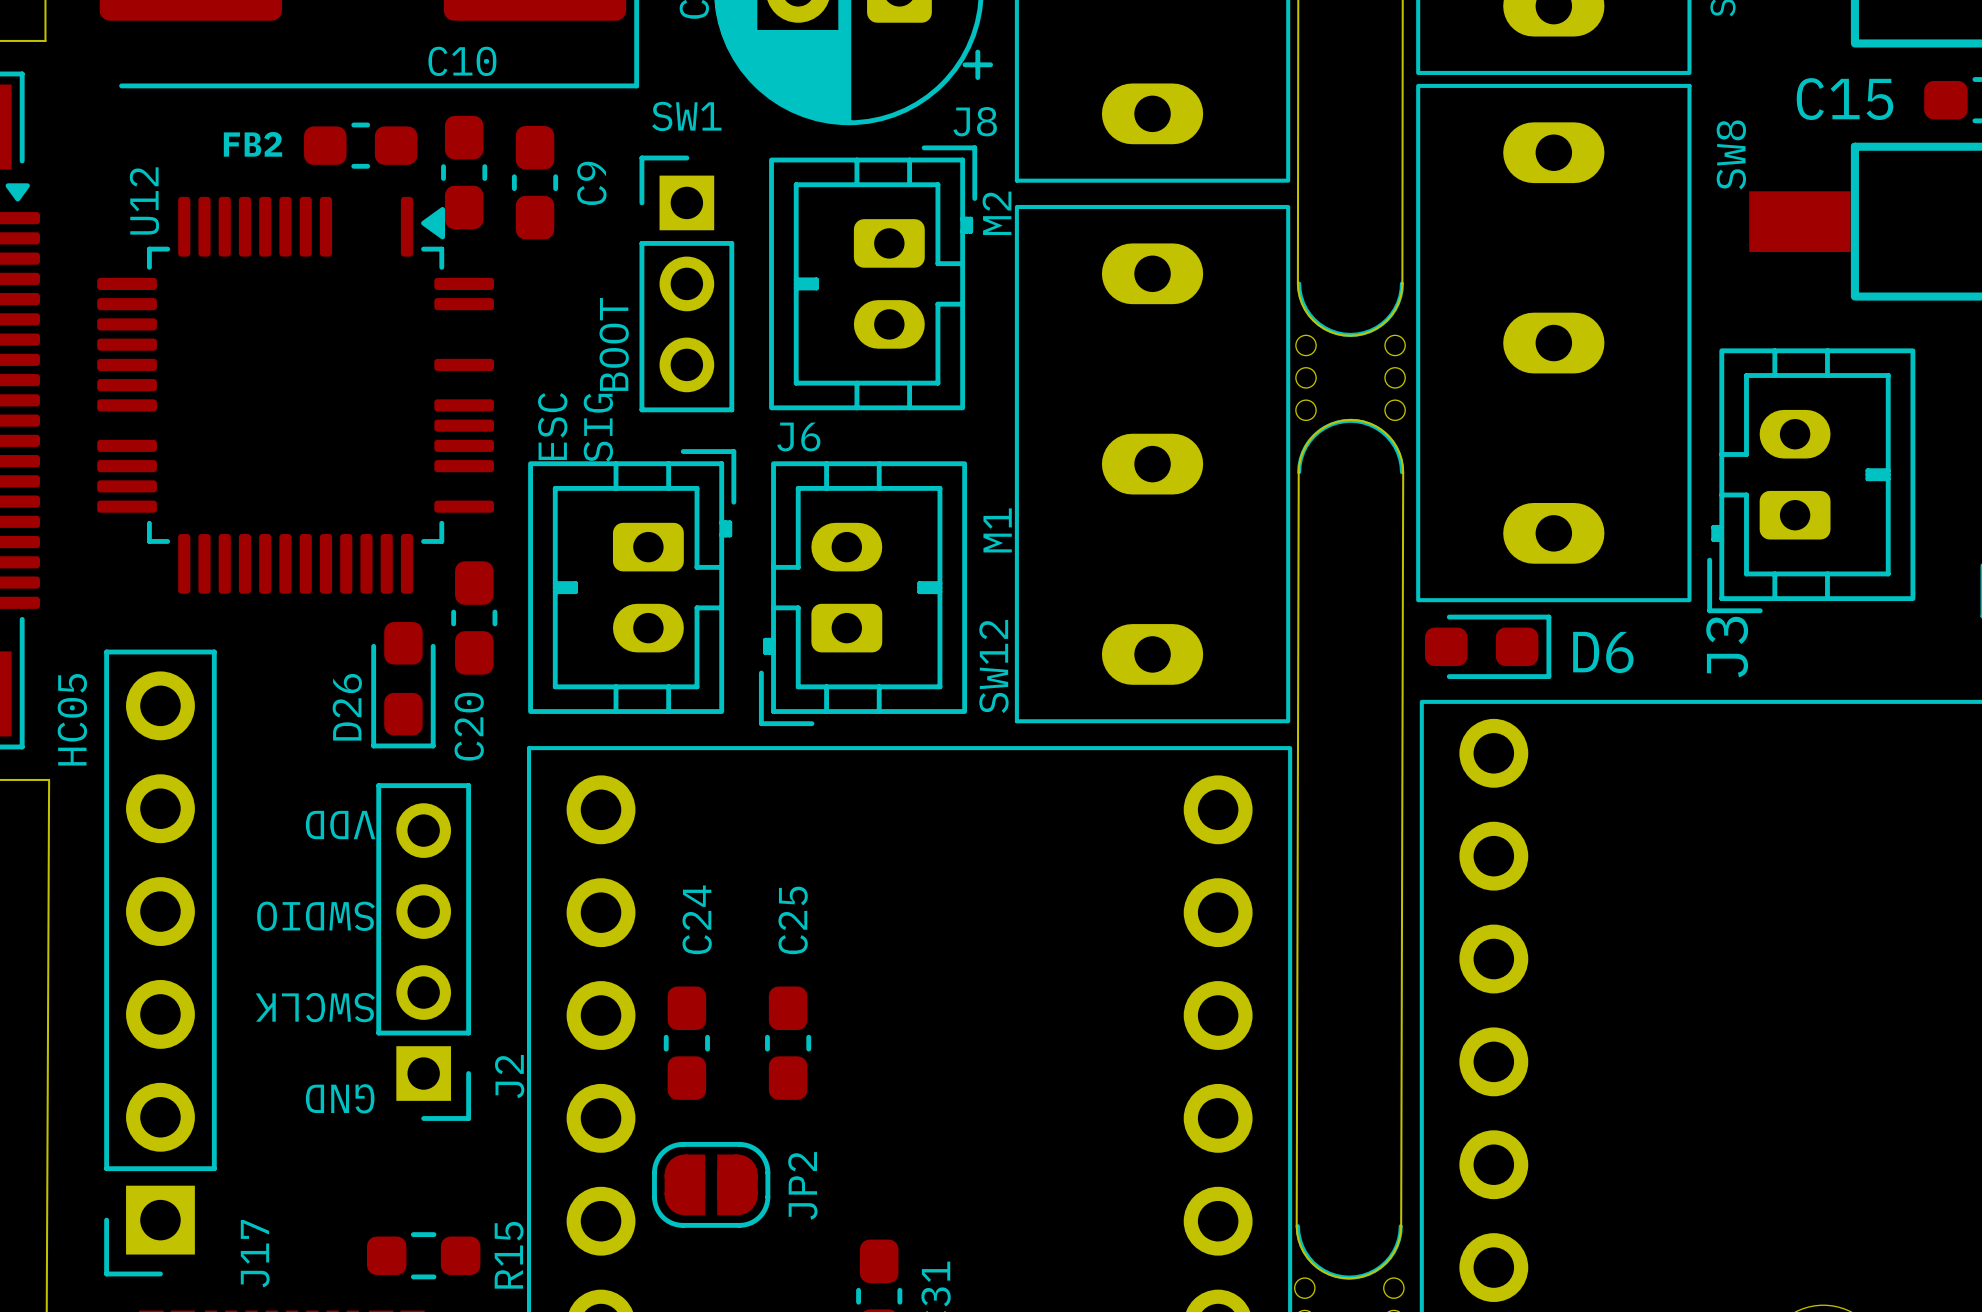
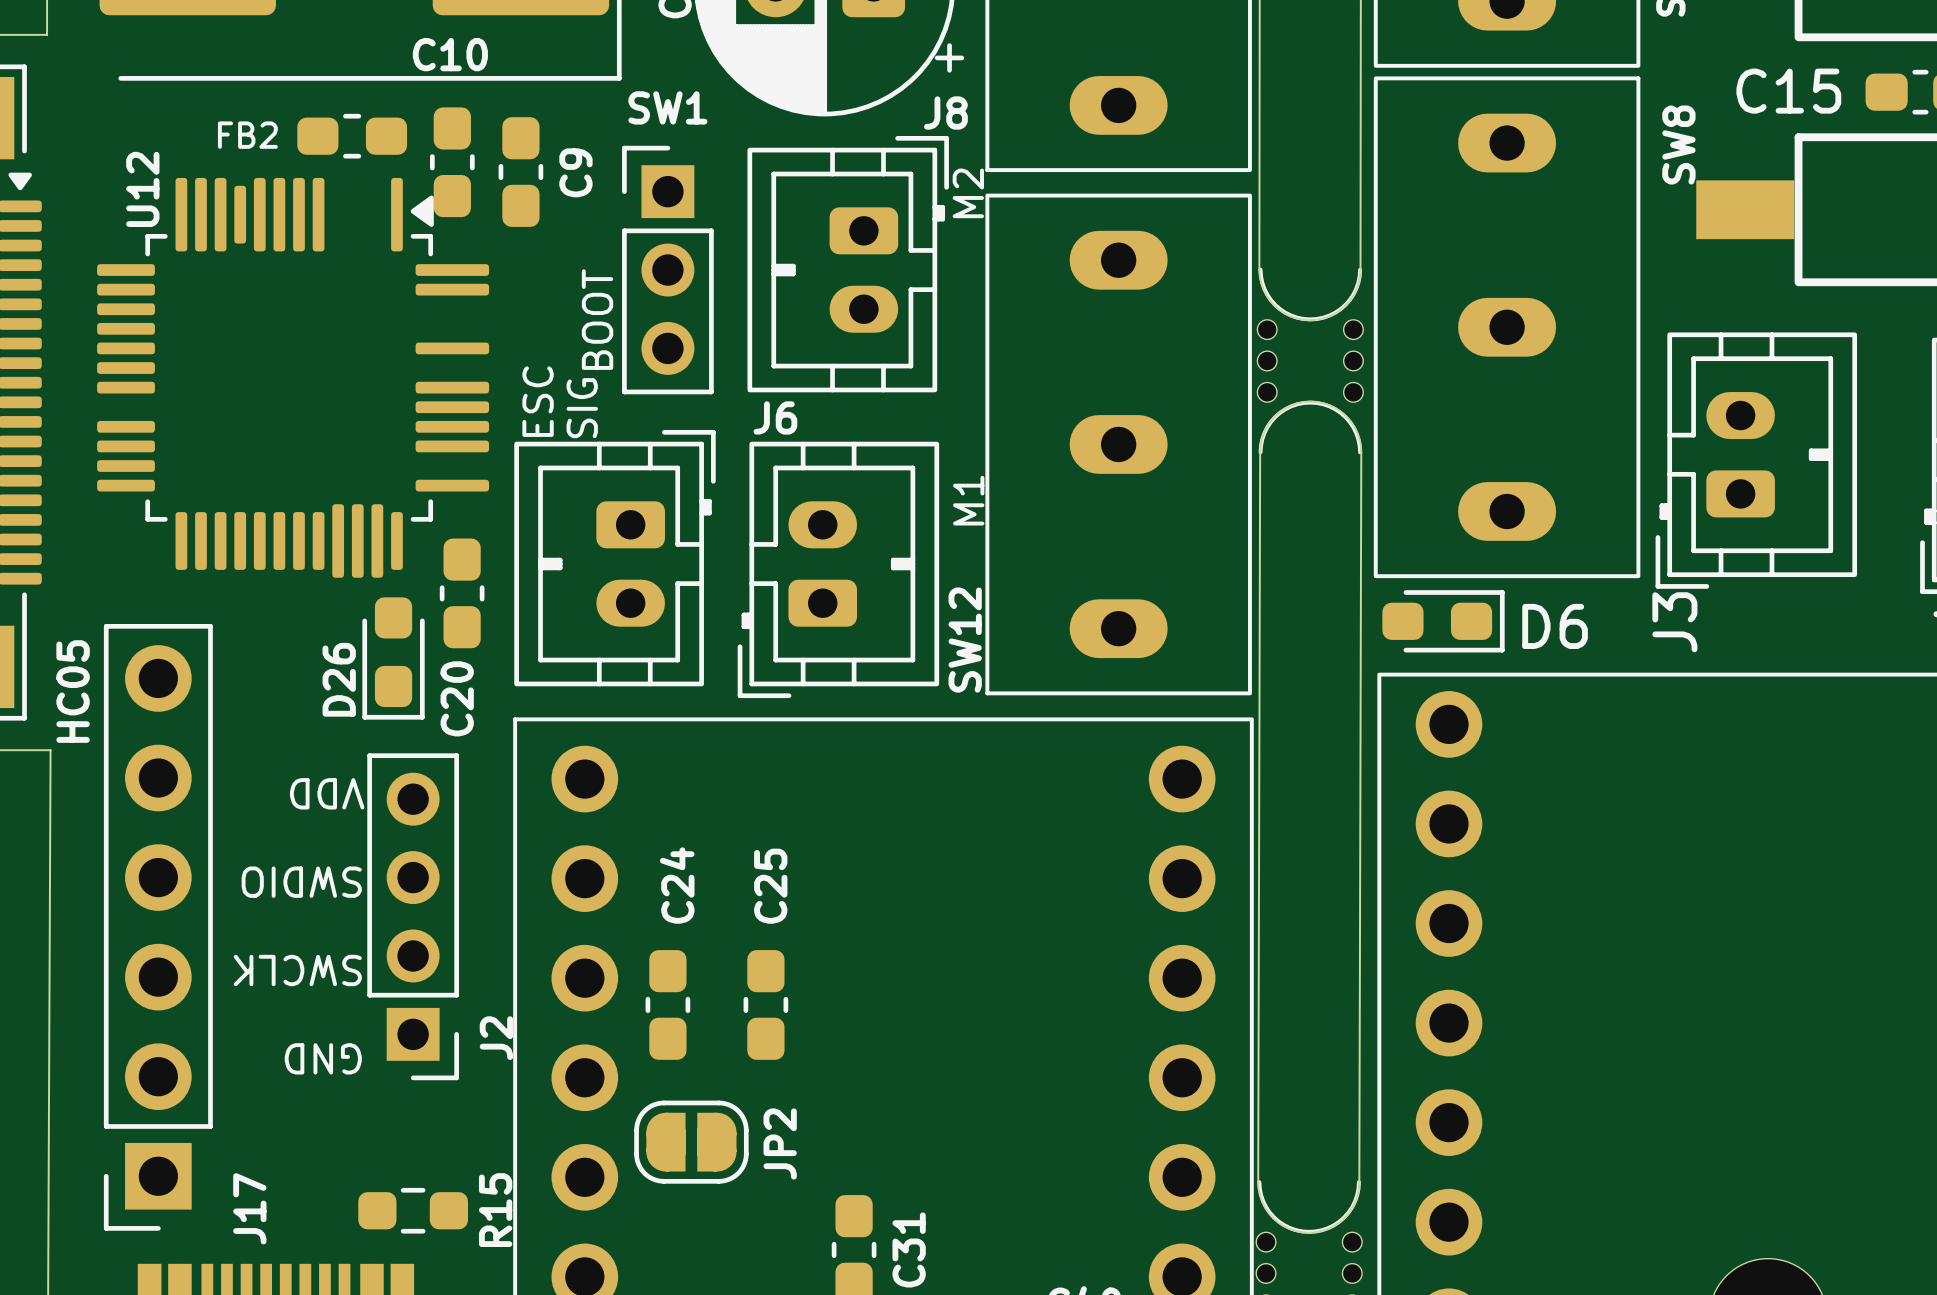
U12 footprint: [97, 196, 495, 594] -> [97, 177, 490, 578]

